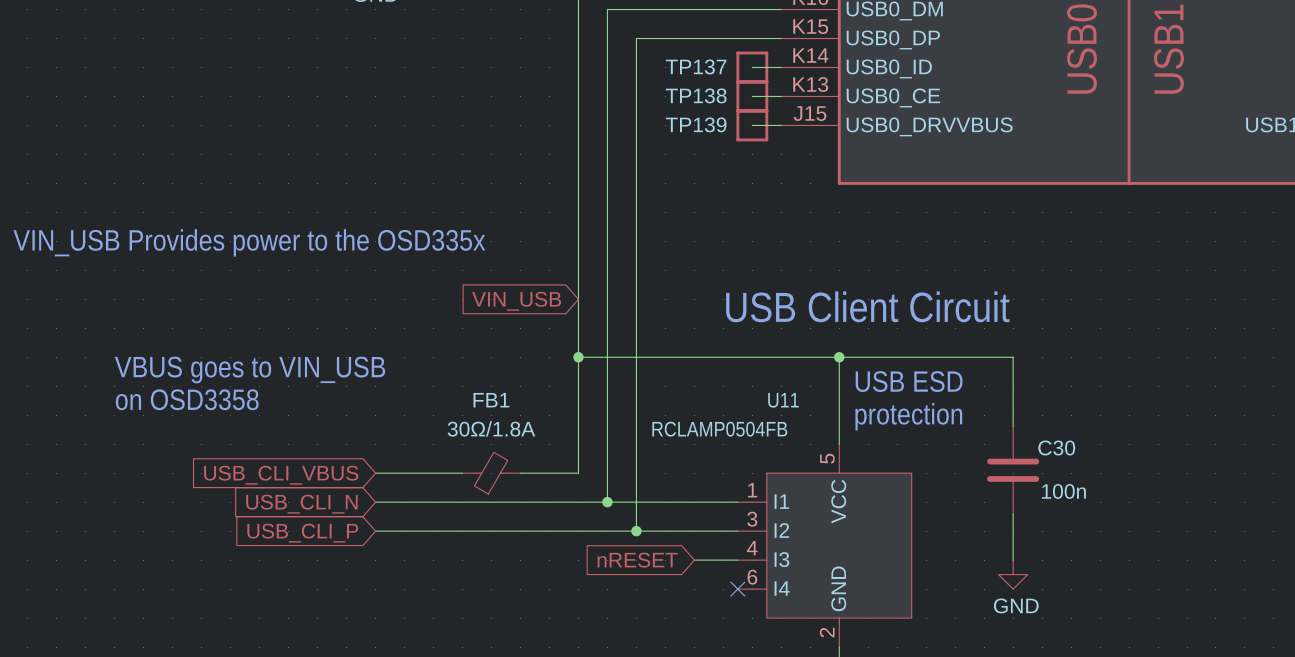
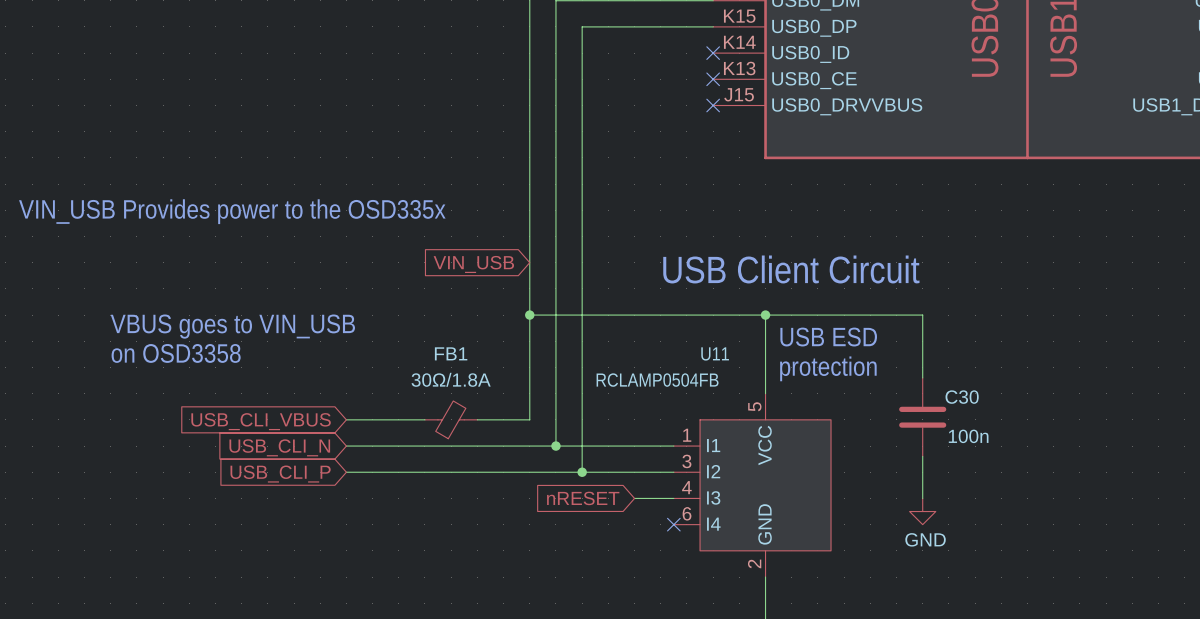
wire: (752, 67) (781, 67) -> none
TP137: (752, 67) -> none
no-connect mark: none -> (713, 53)
wire: (752, 96) (781, 96) -> none
TP138: (752, 96) -> none
no-connect mark: none -> (713, 79)
wire: (752, 125) (781, 125) -> none
TP139: (752, 125) -> none
no-connect mark: none -> (713, 105)

